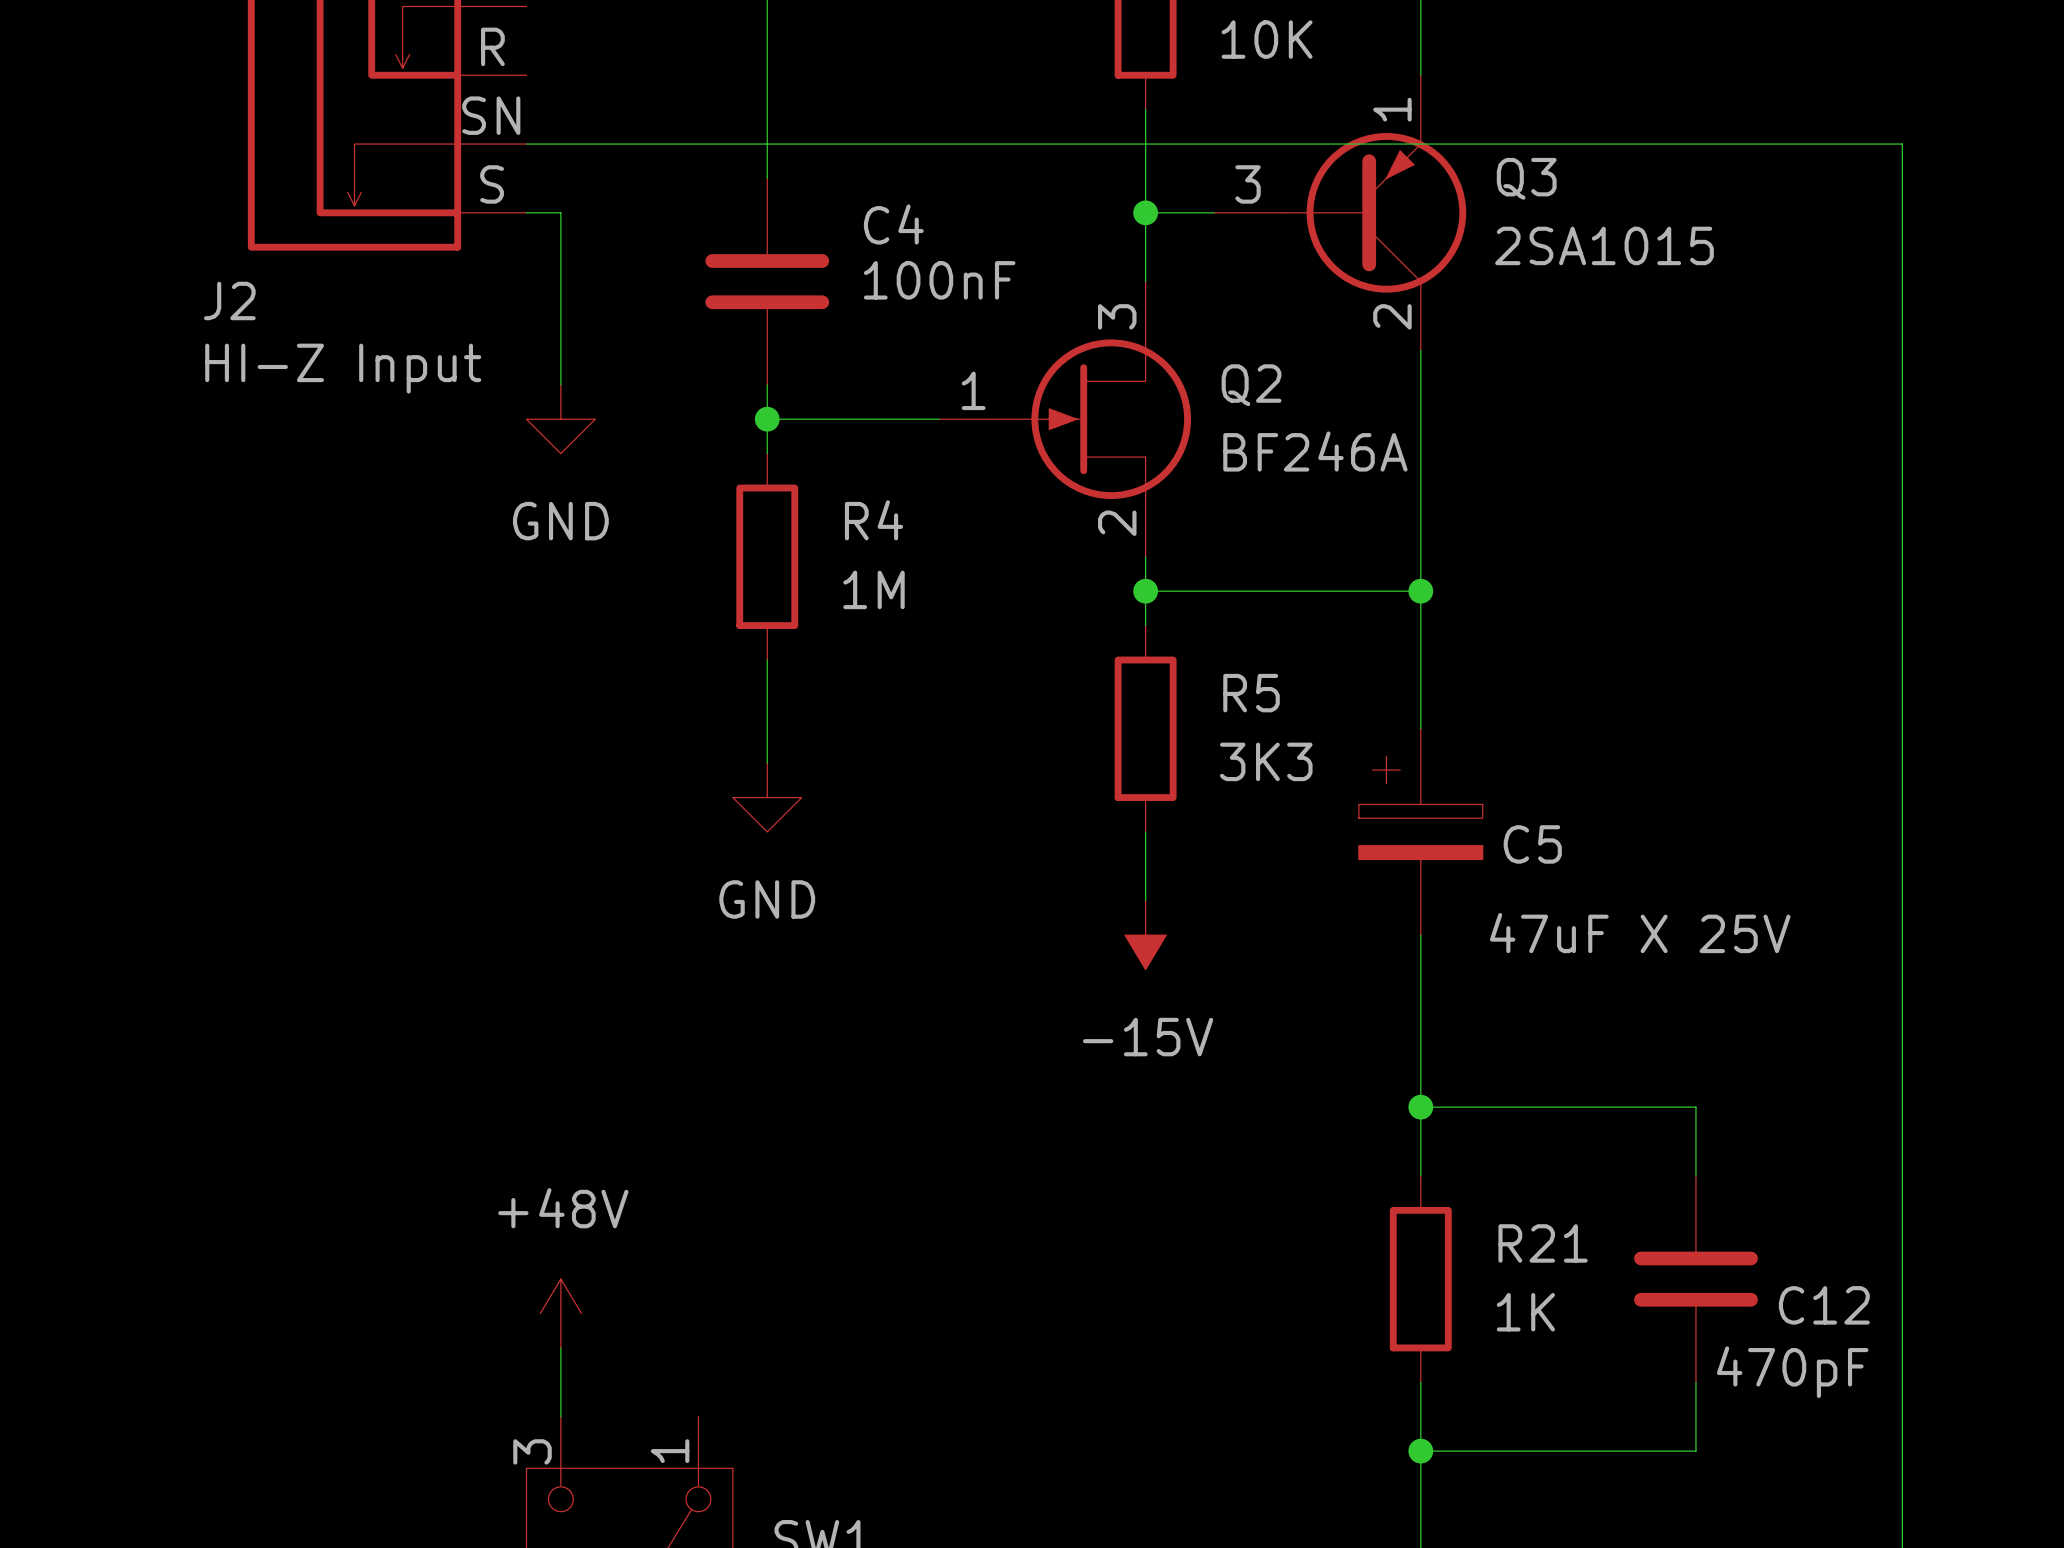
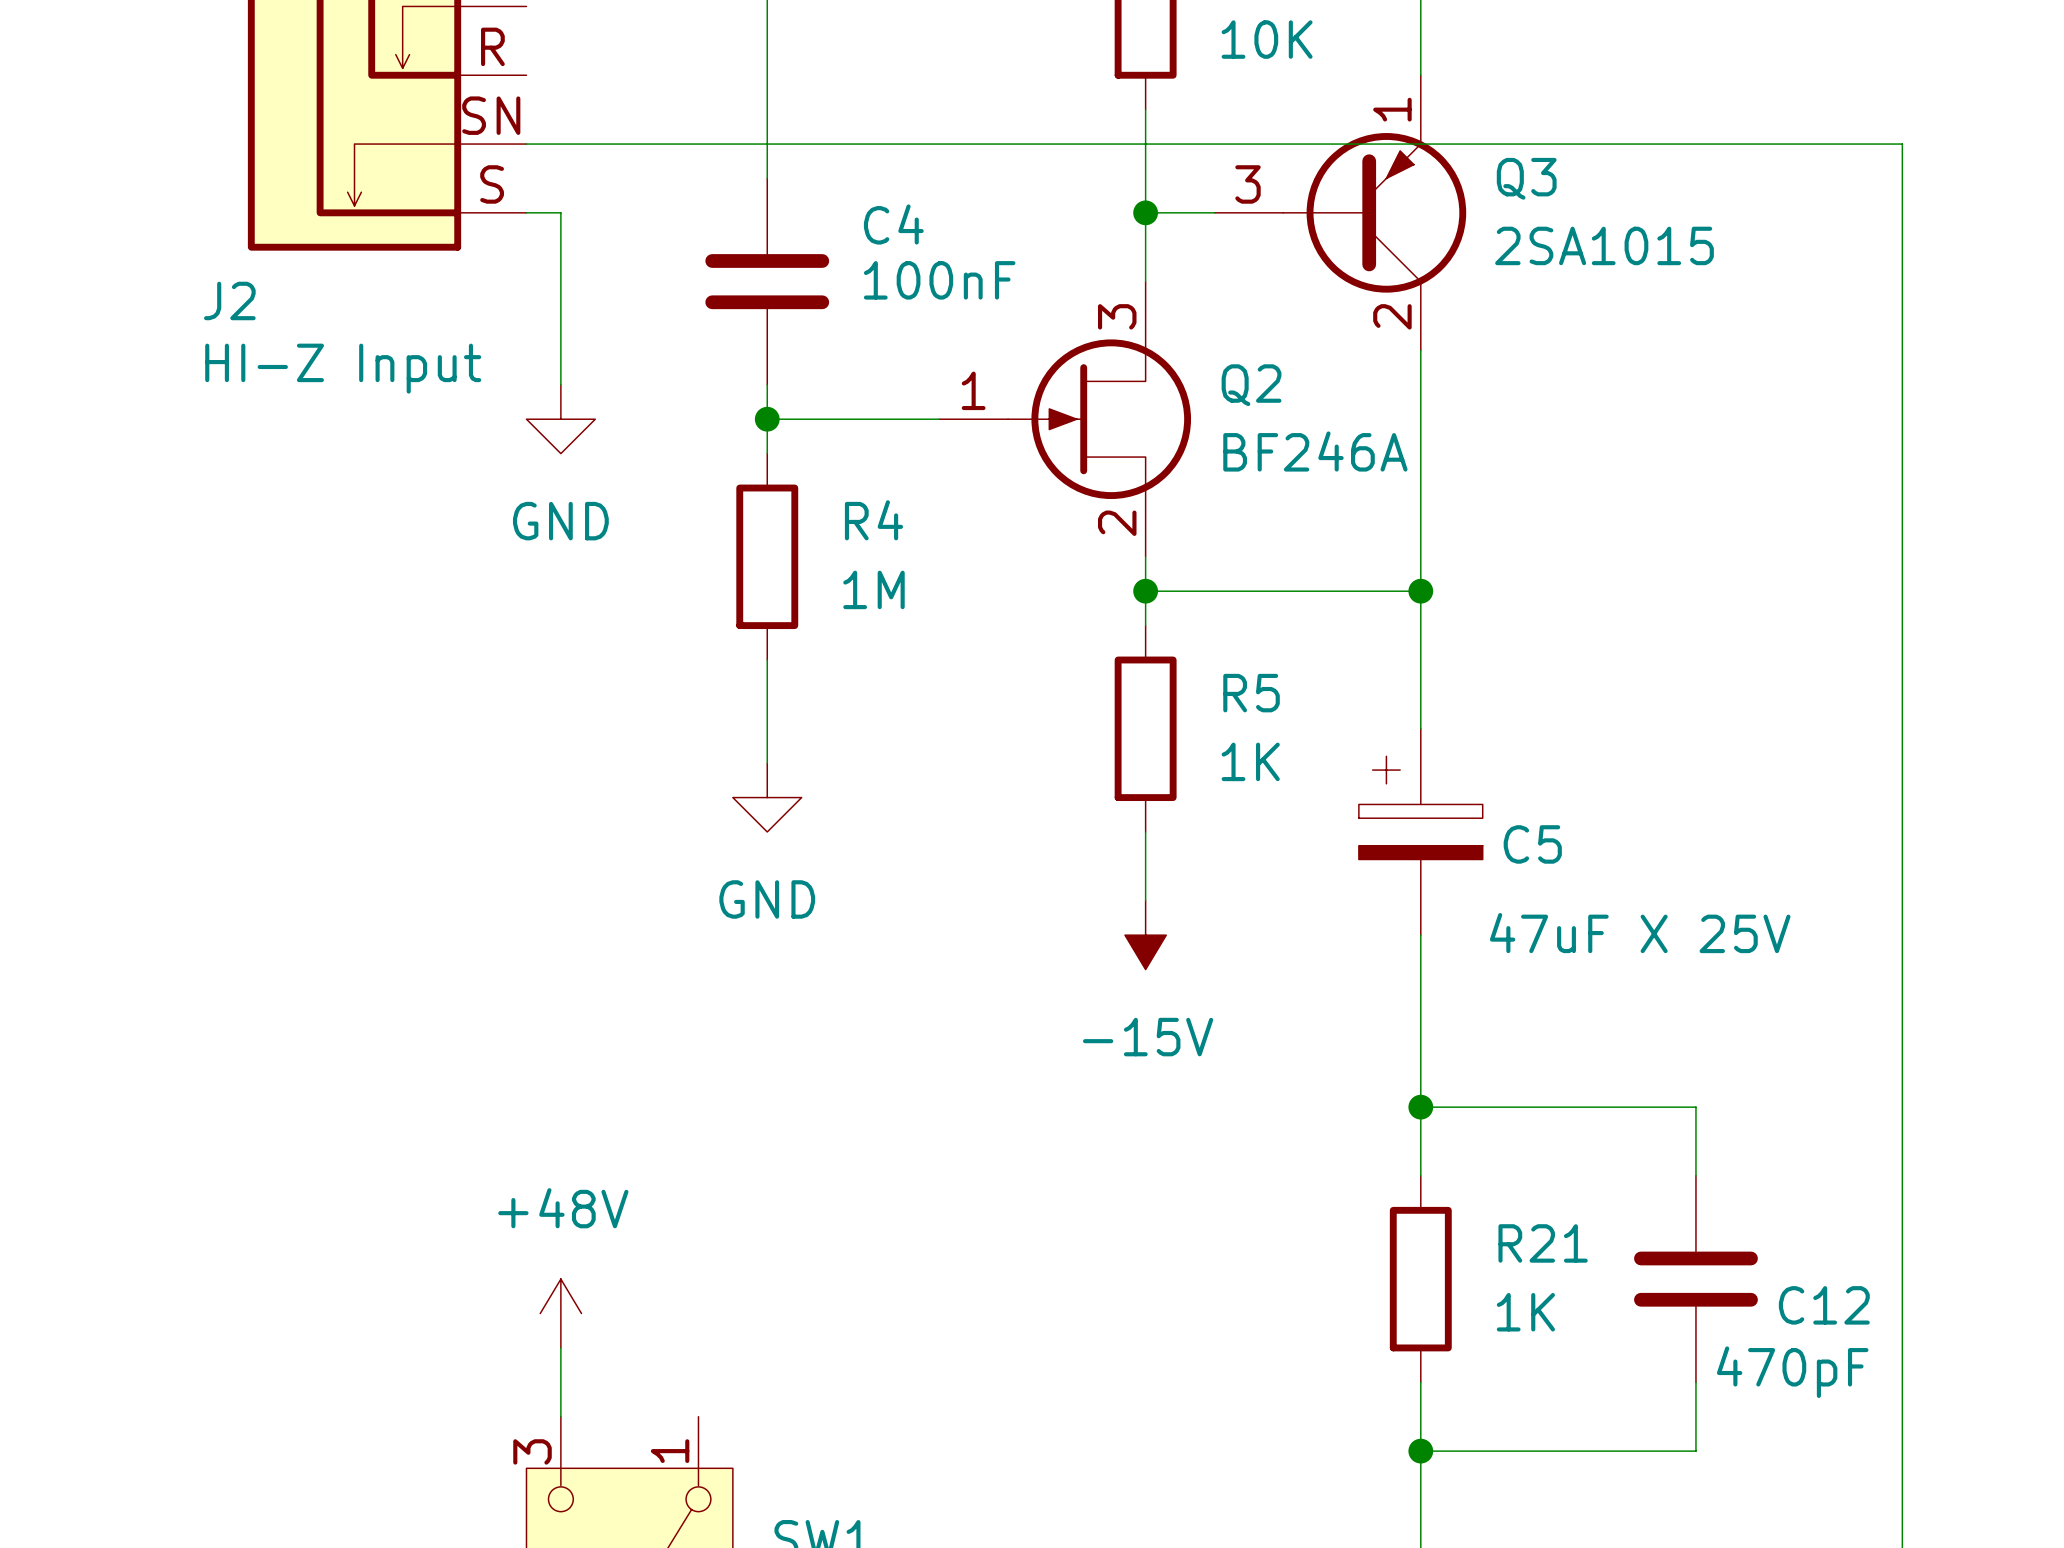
R5 value: 3K3 (1266, 761) -> 1K (1250, 761)

